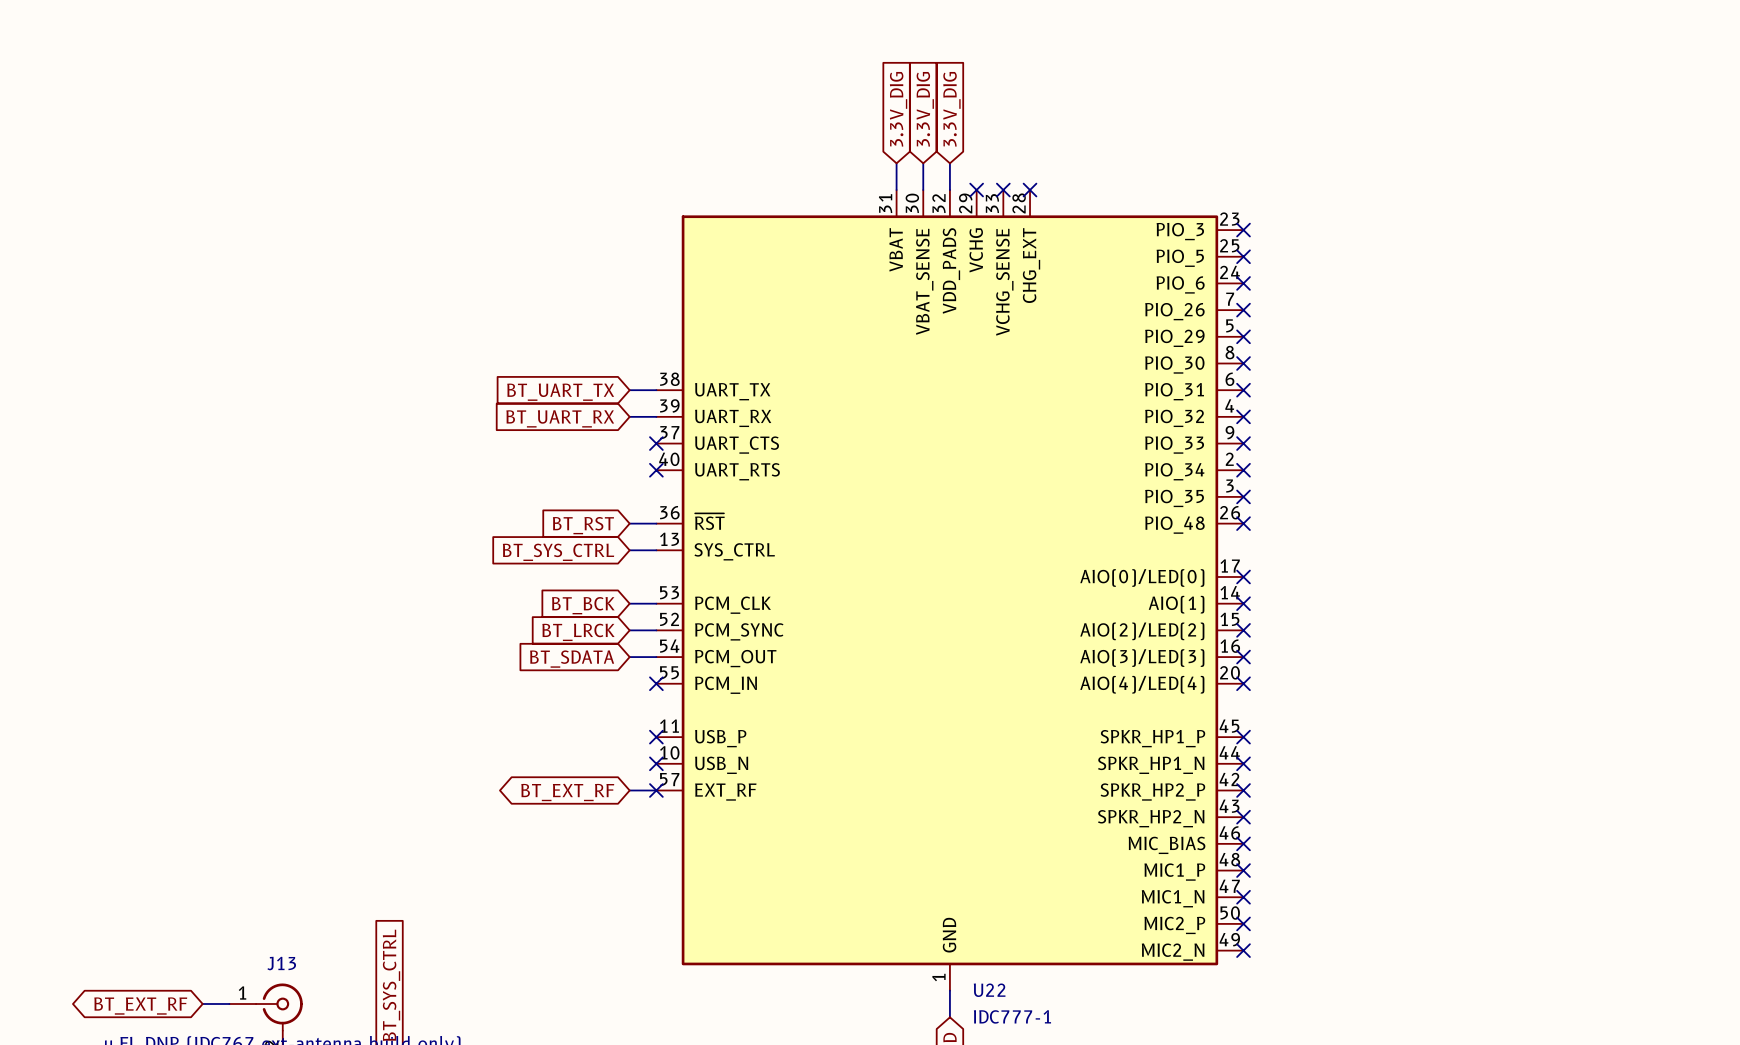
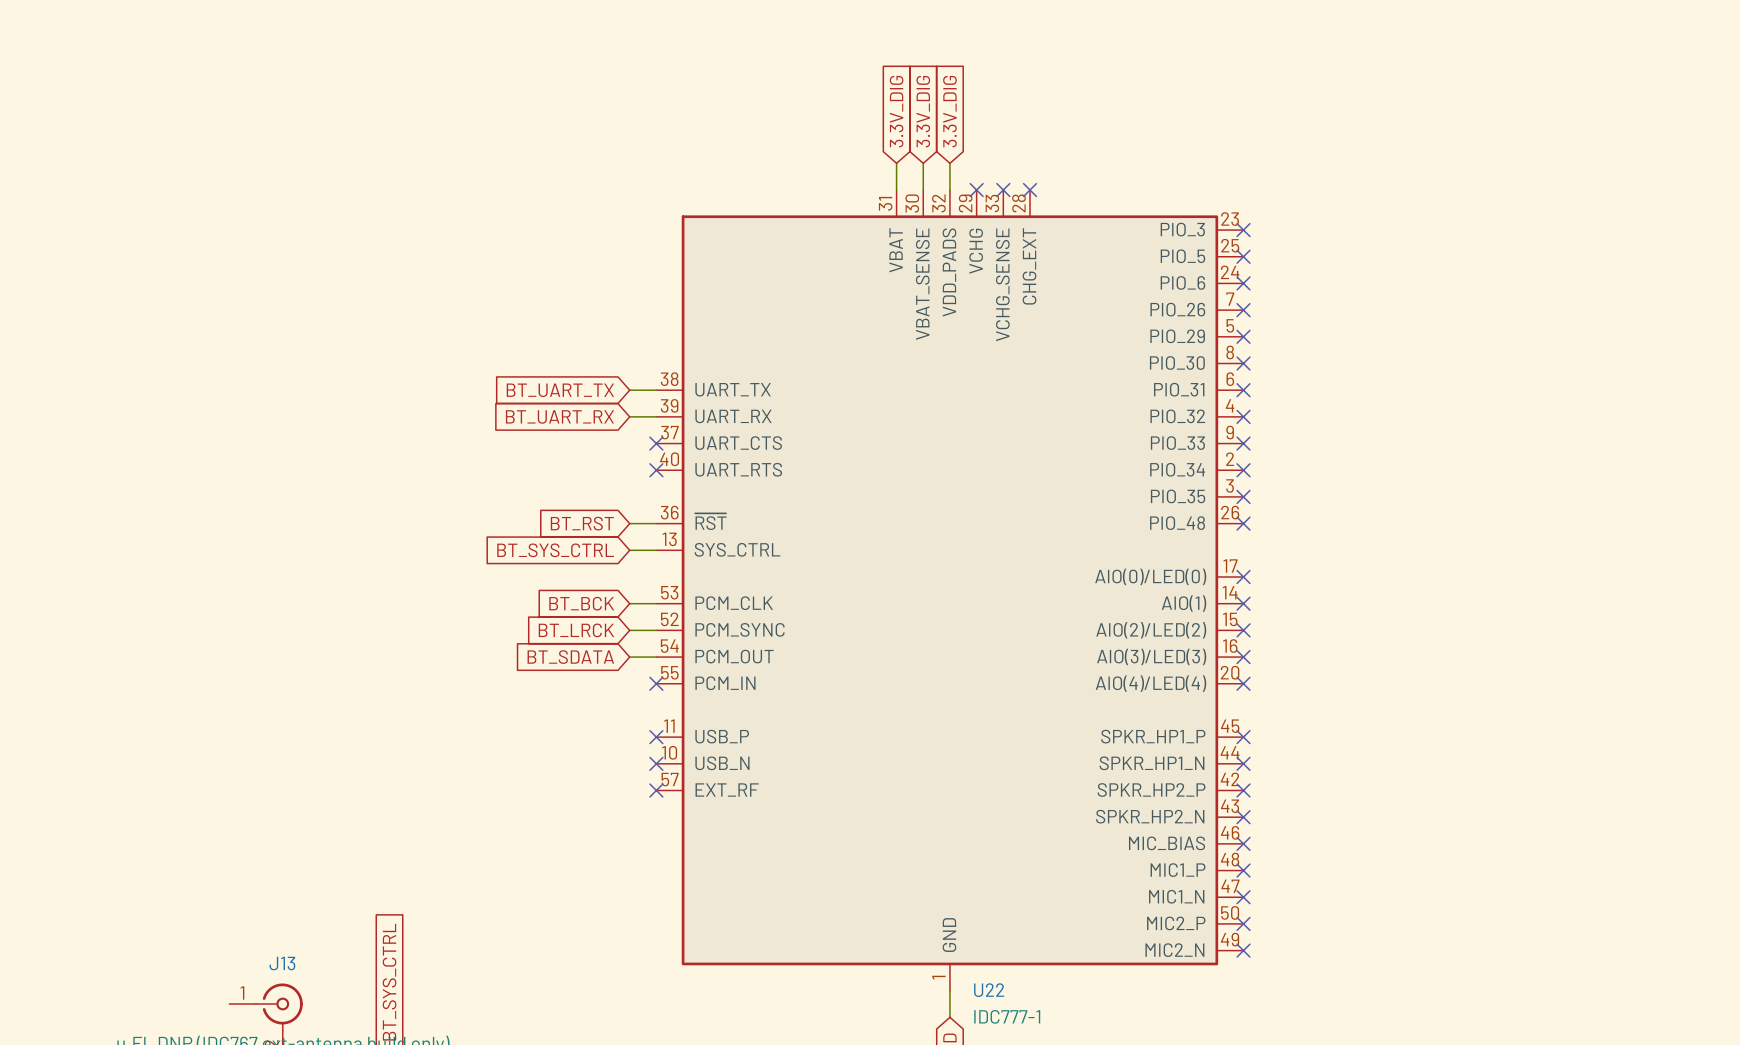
wire: (629, 790) (656, 790) -> none
global label: BT_EXT_RF (567, 792) -> none
wire: (202, 1003) (229, 1003) -> none
global label: BT_EXT_RF (140, 1005) -> none

